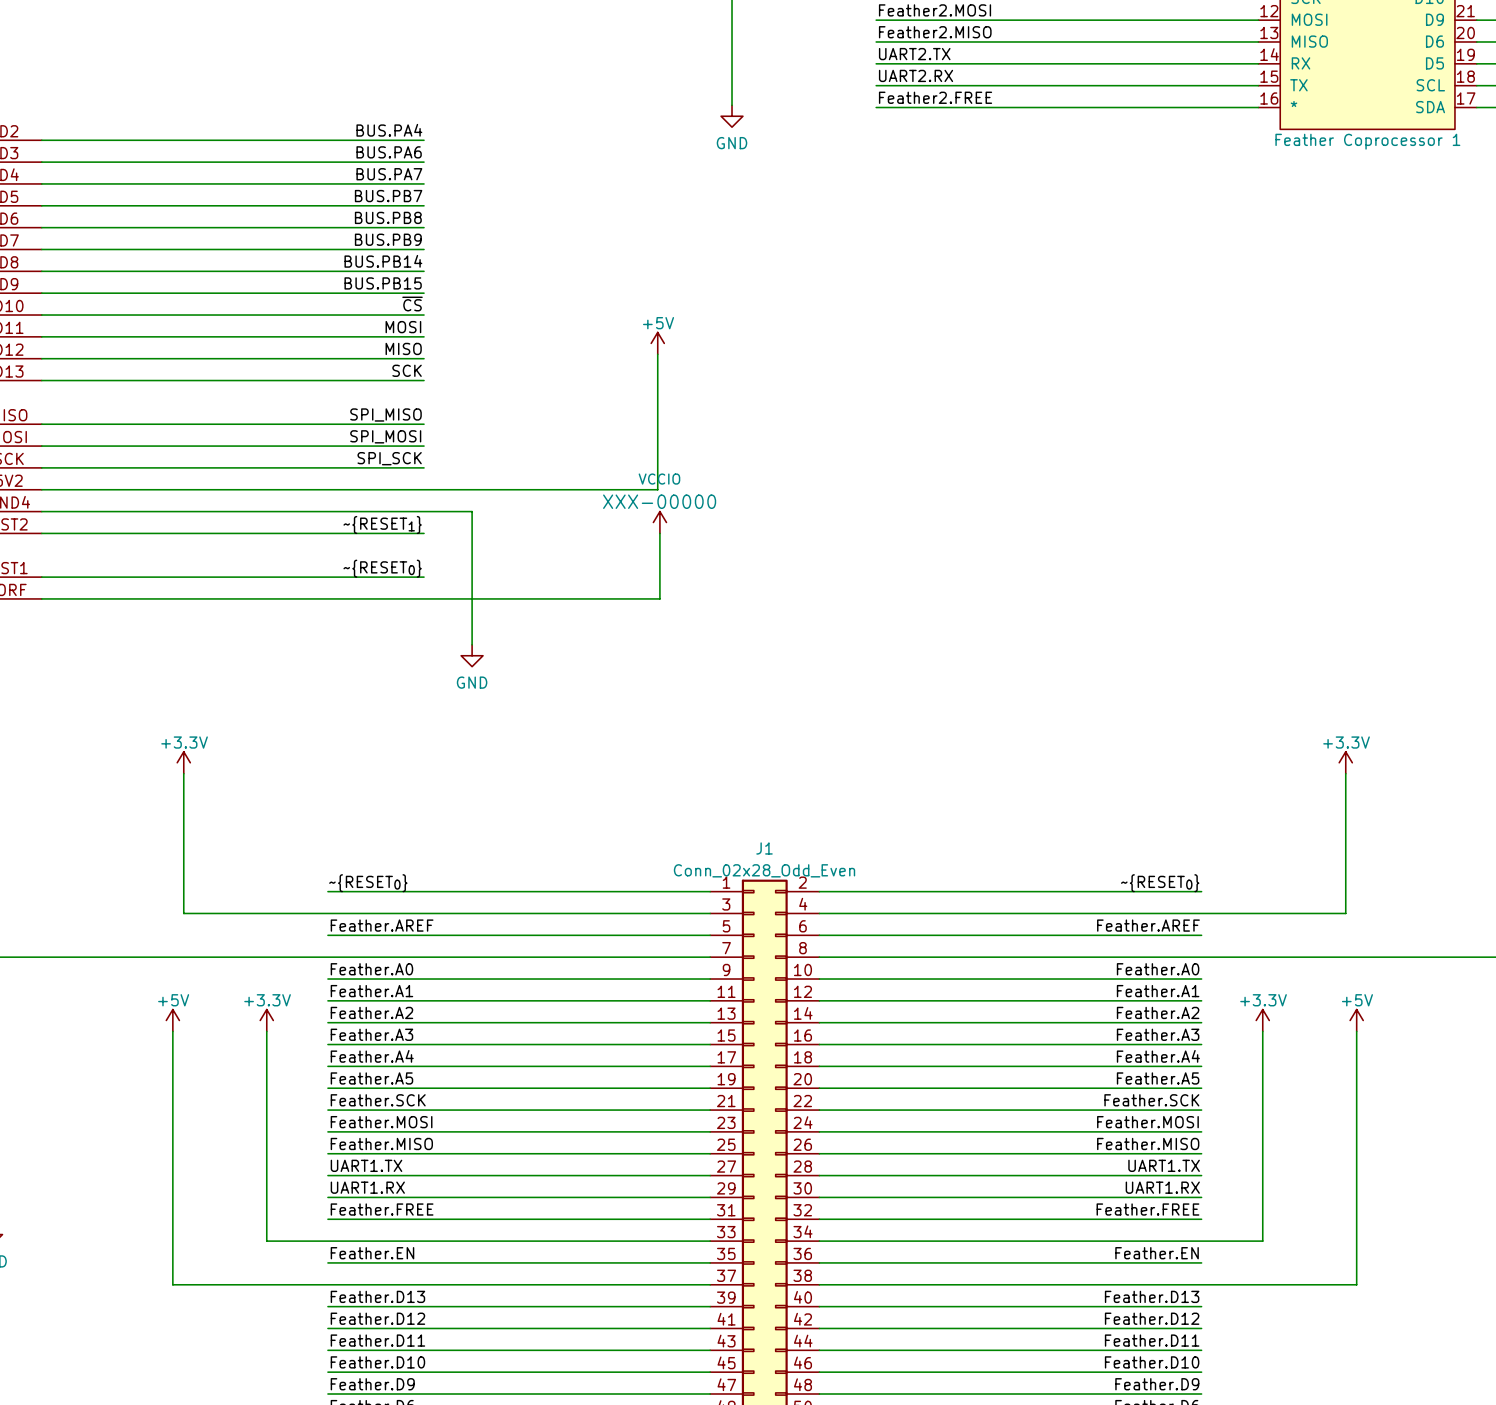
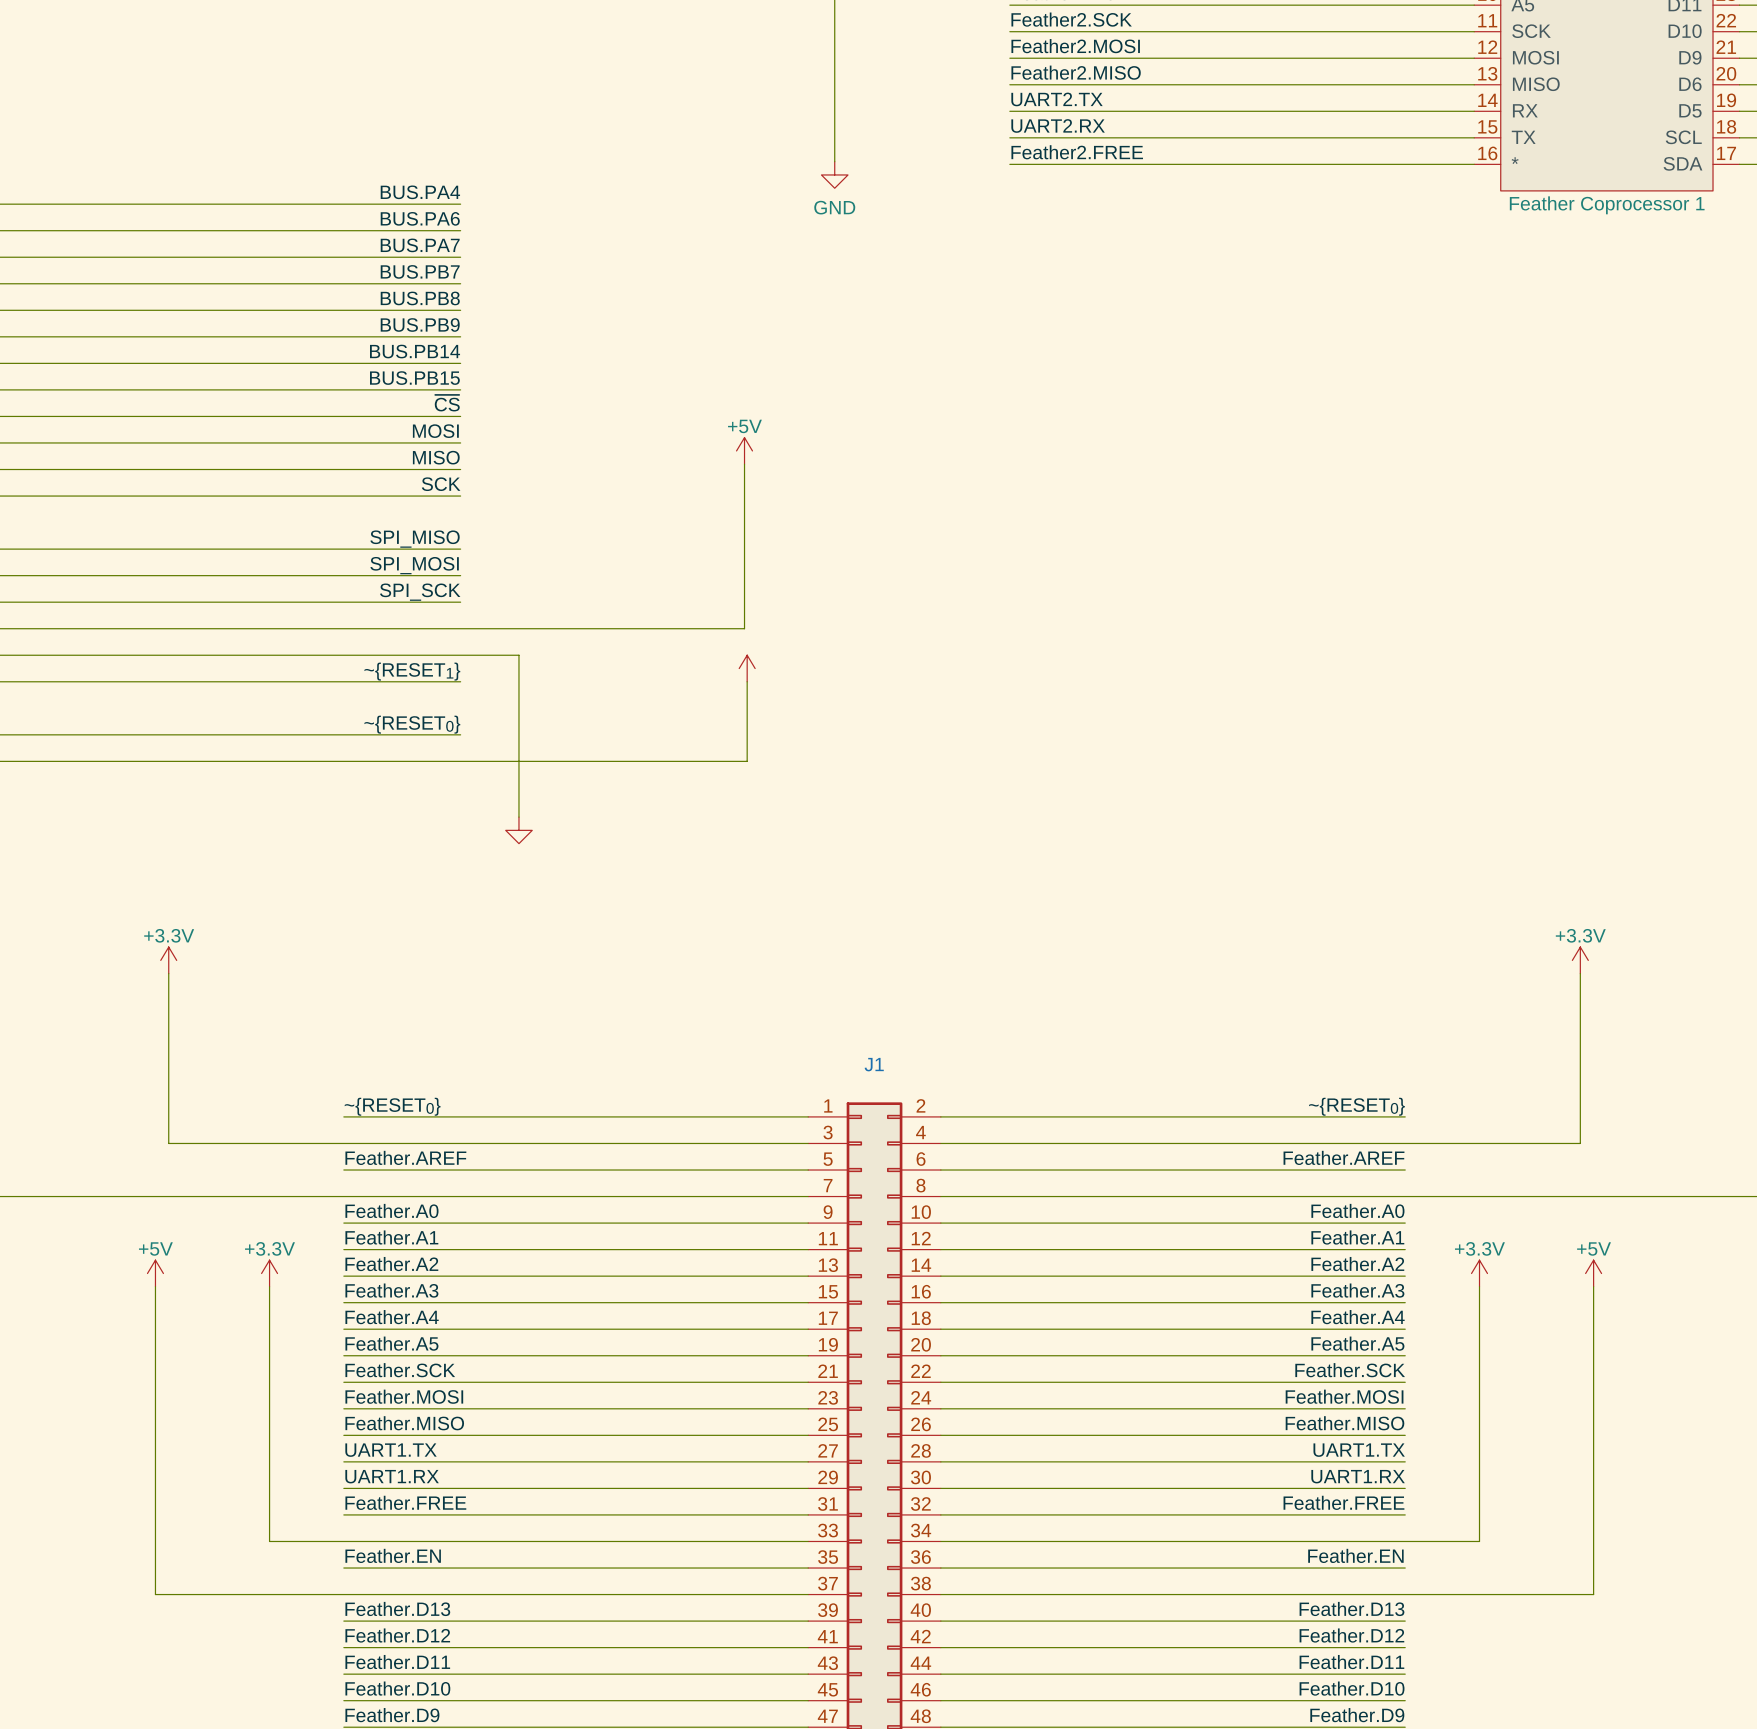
power symbol text: VCCIO (659, 479) -> none
power symbol text: XXX-00000 (659, 501) -> none
power symbol text: GND (472, 682) -> none
J1 value: Conn_02x28_Odd_Even (764, 870) -> none

